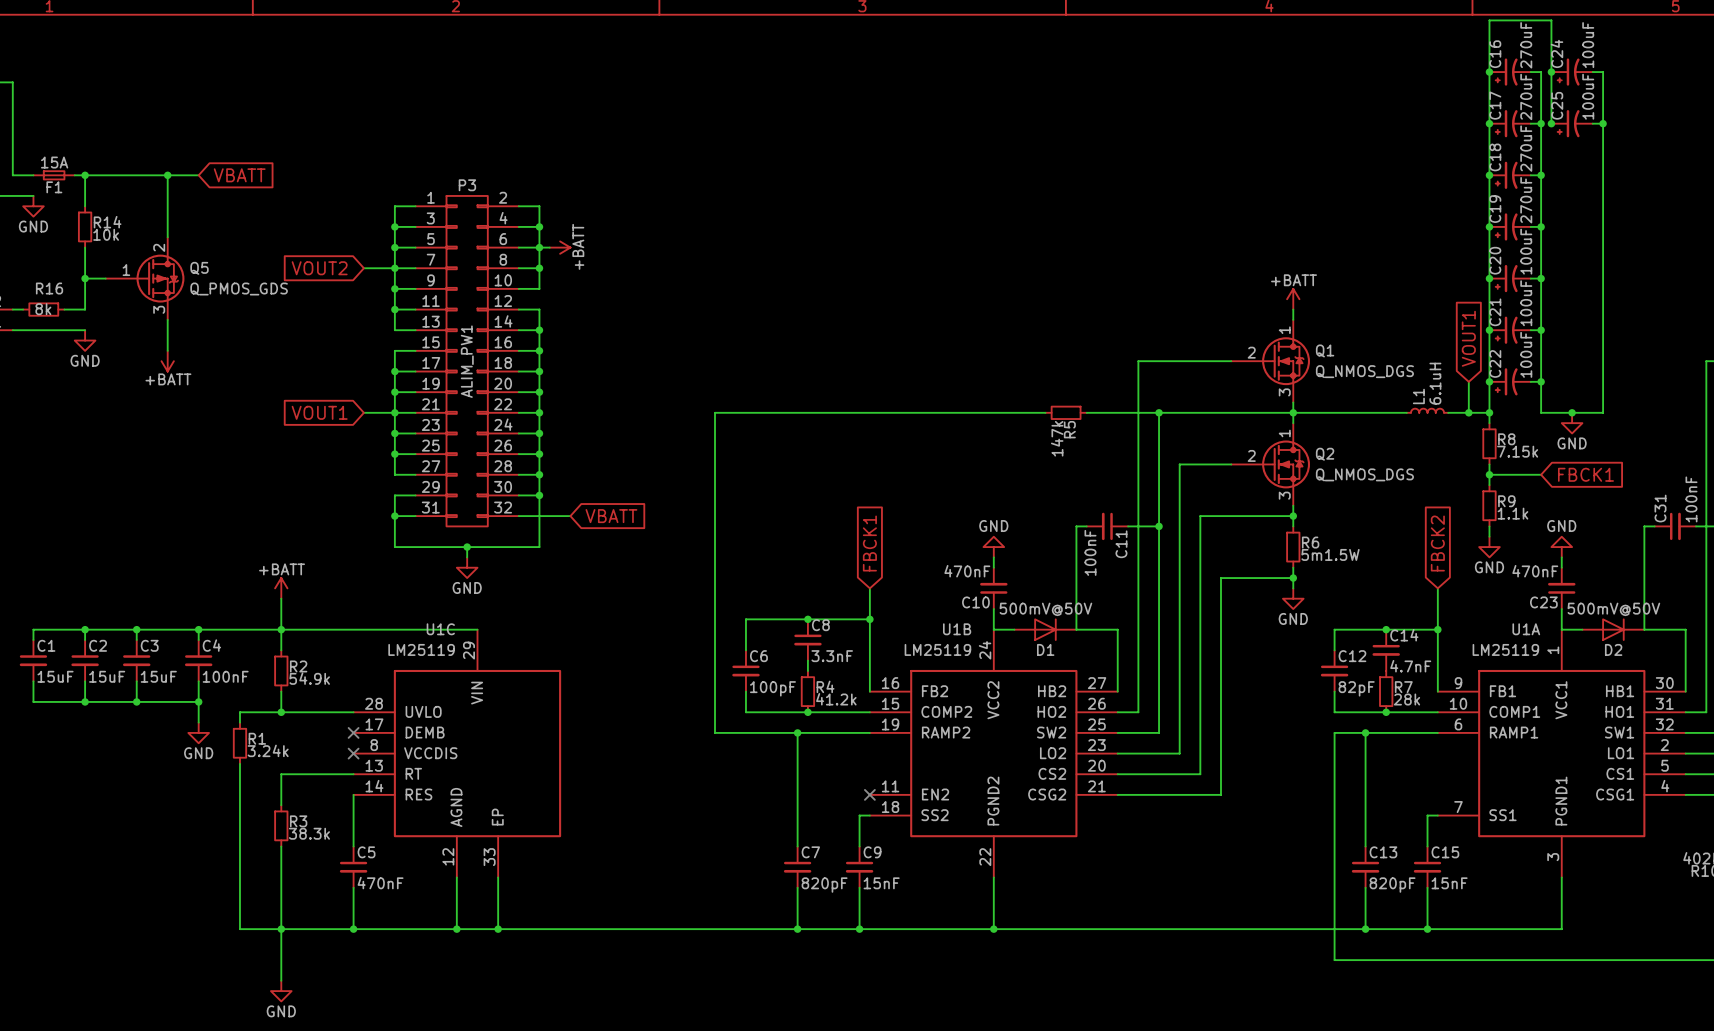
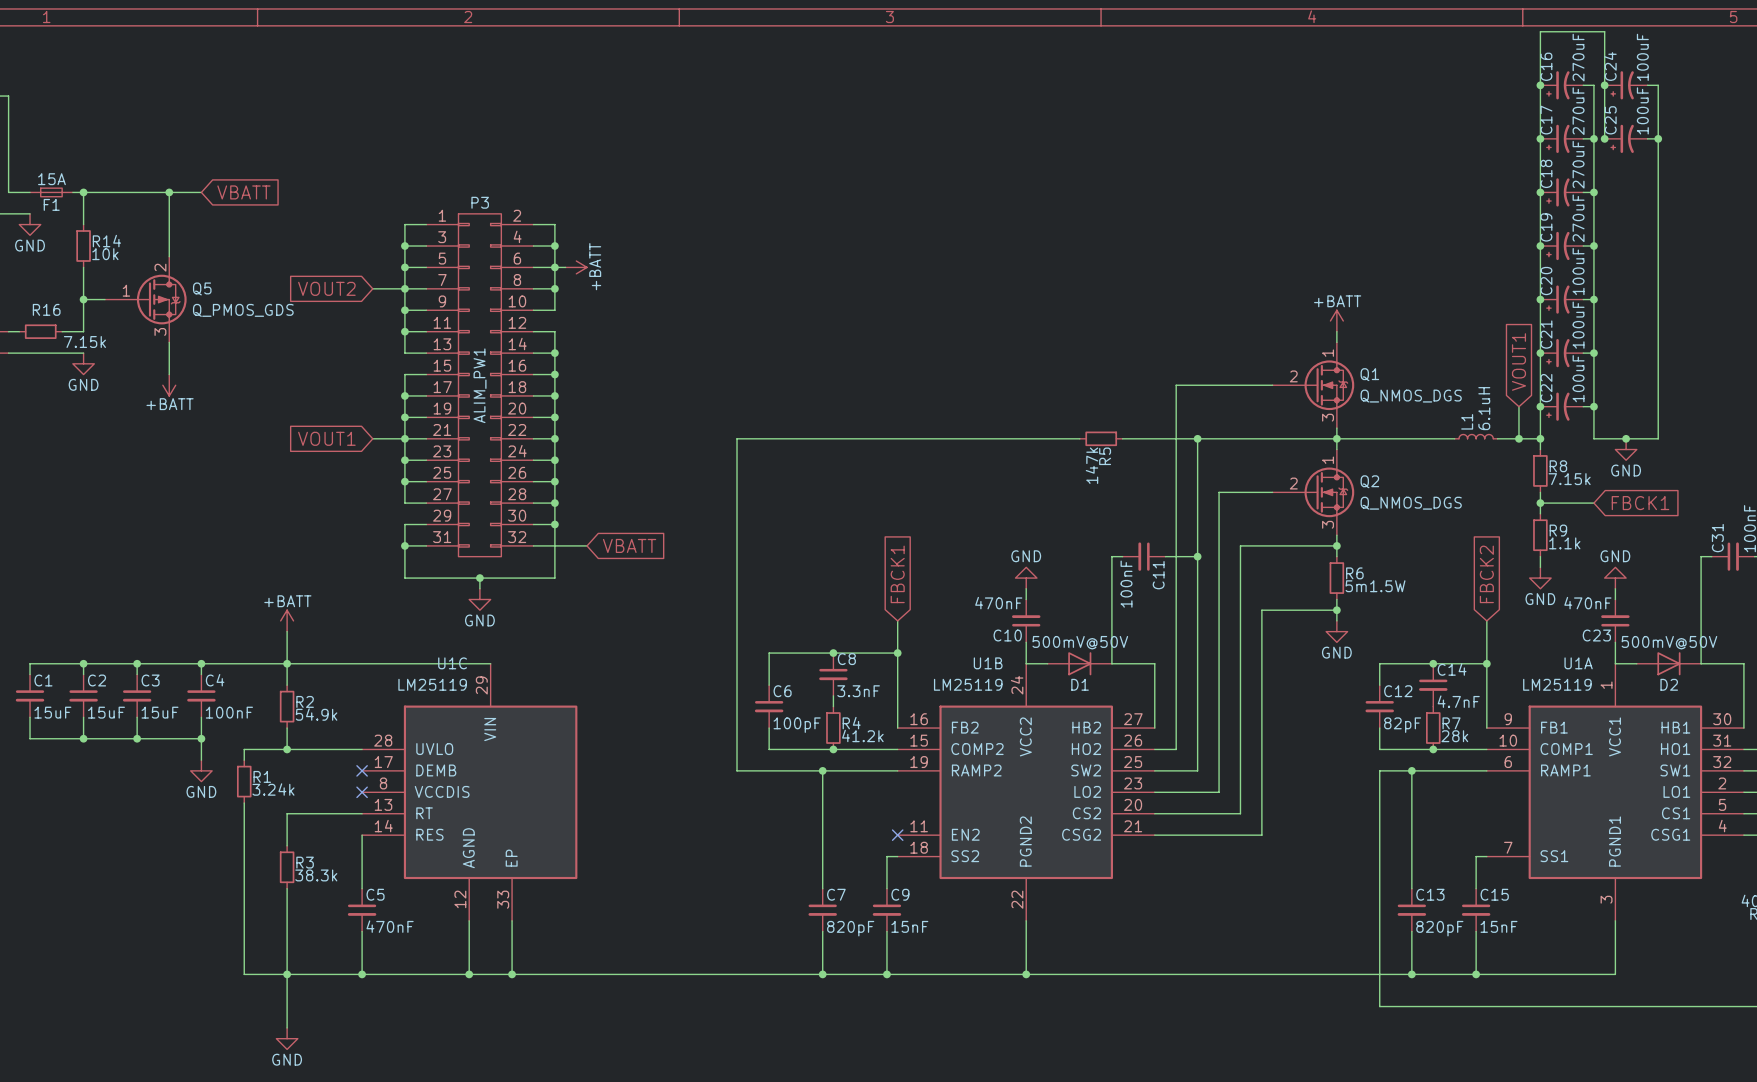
R16 value: 8k (43, 309) -> 7.15k (84, 342)

